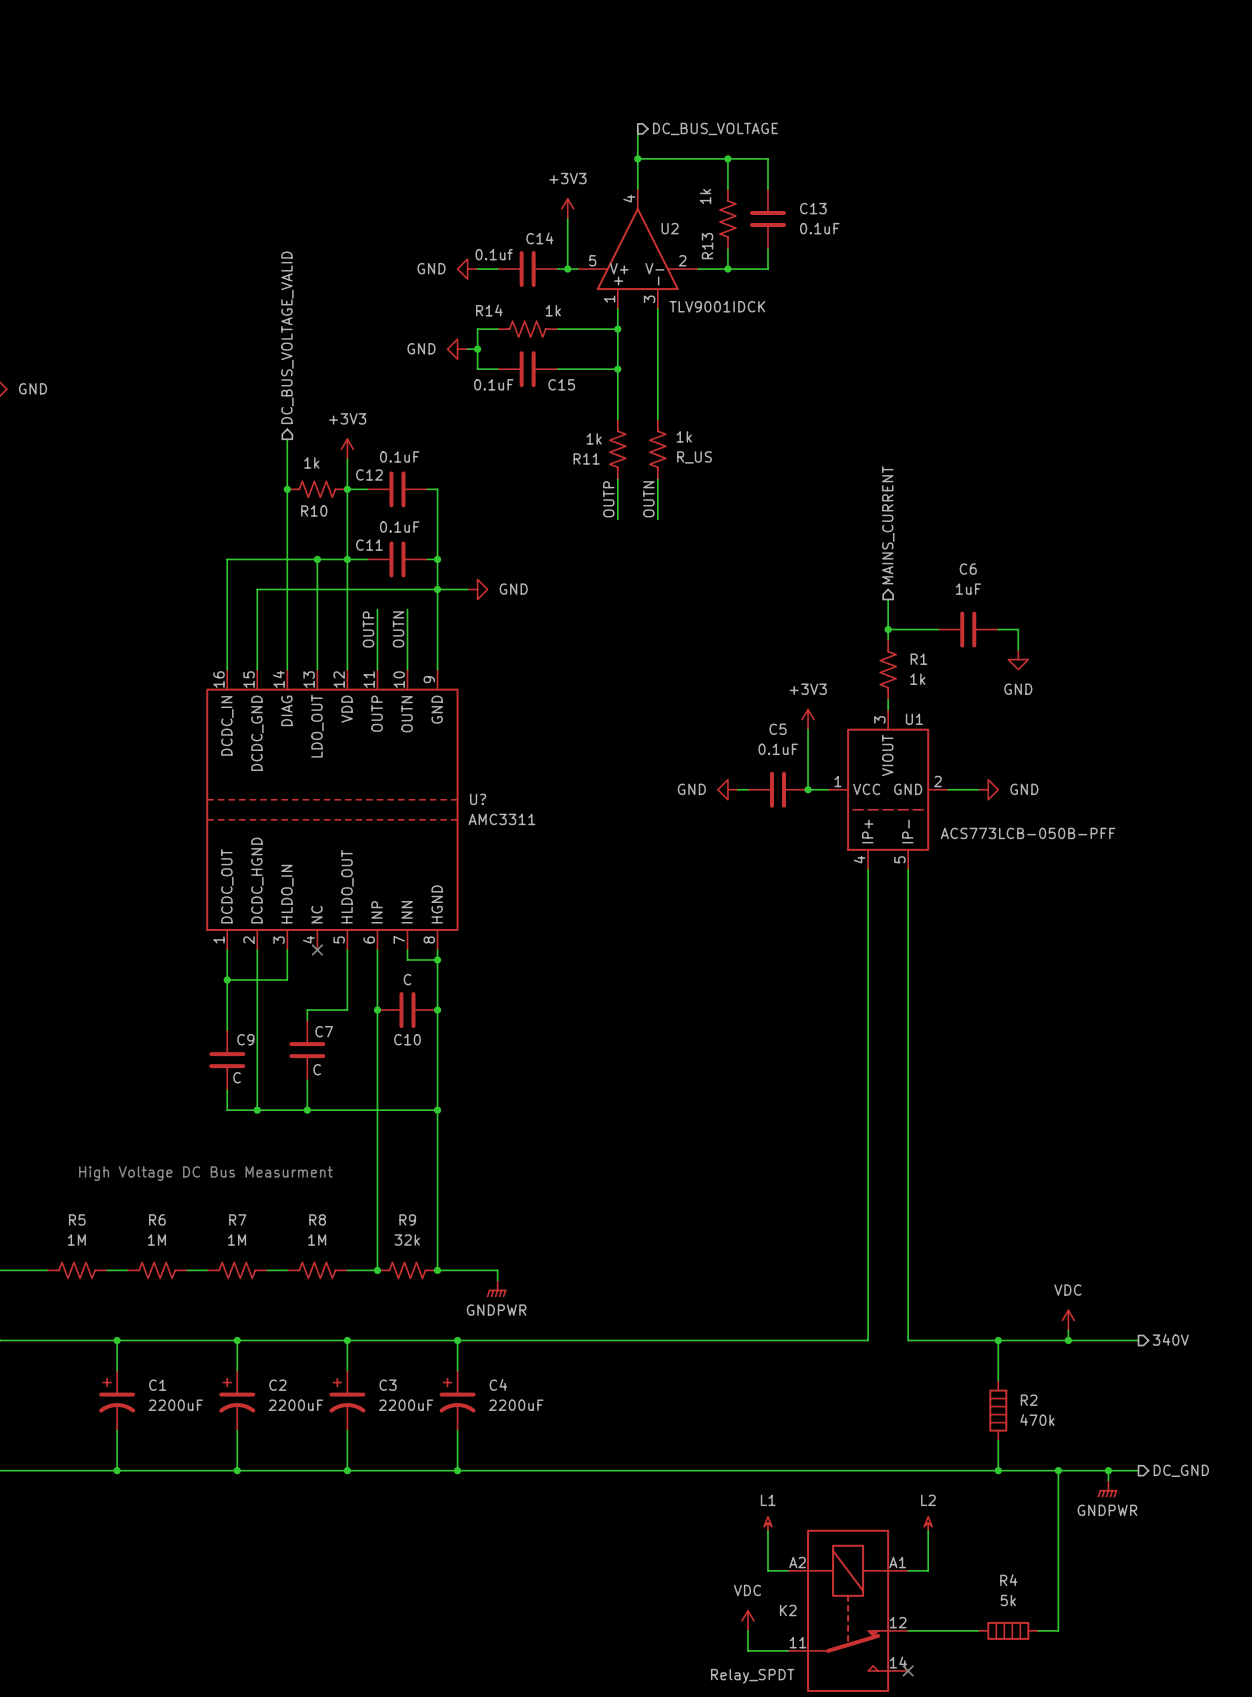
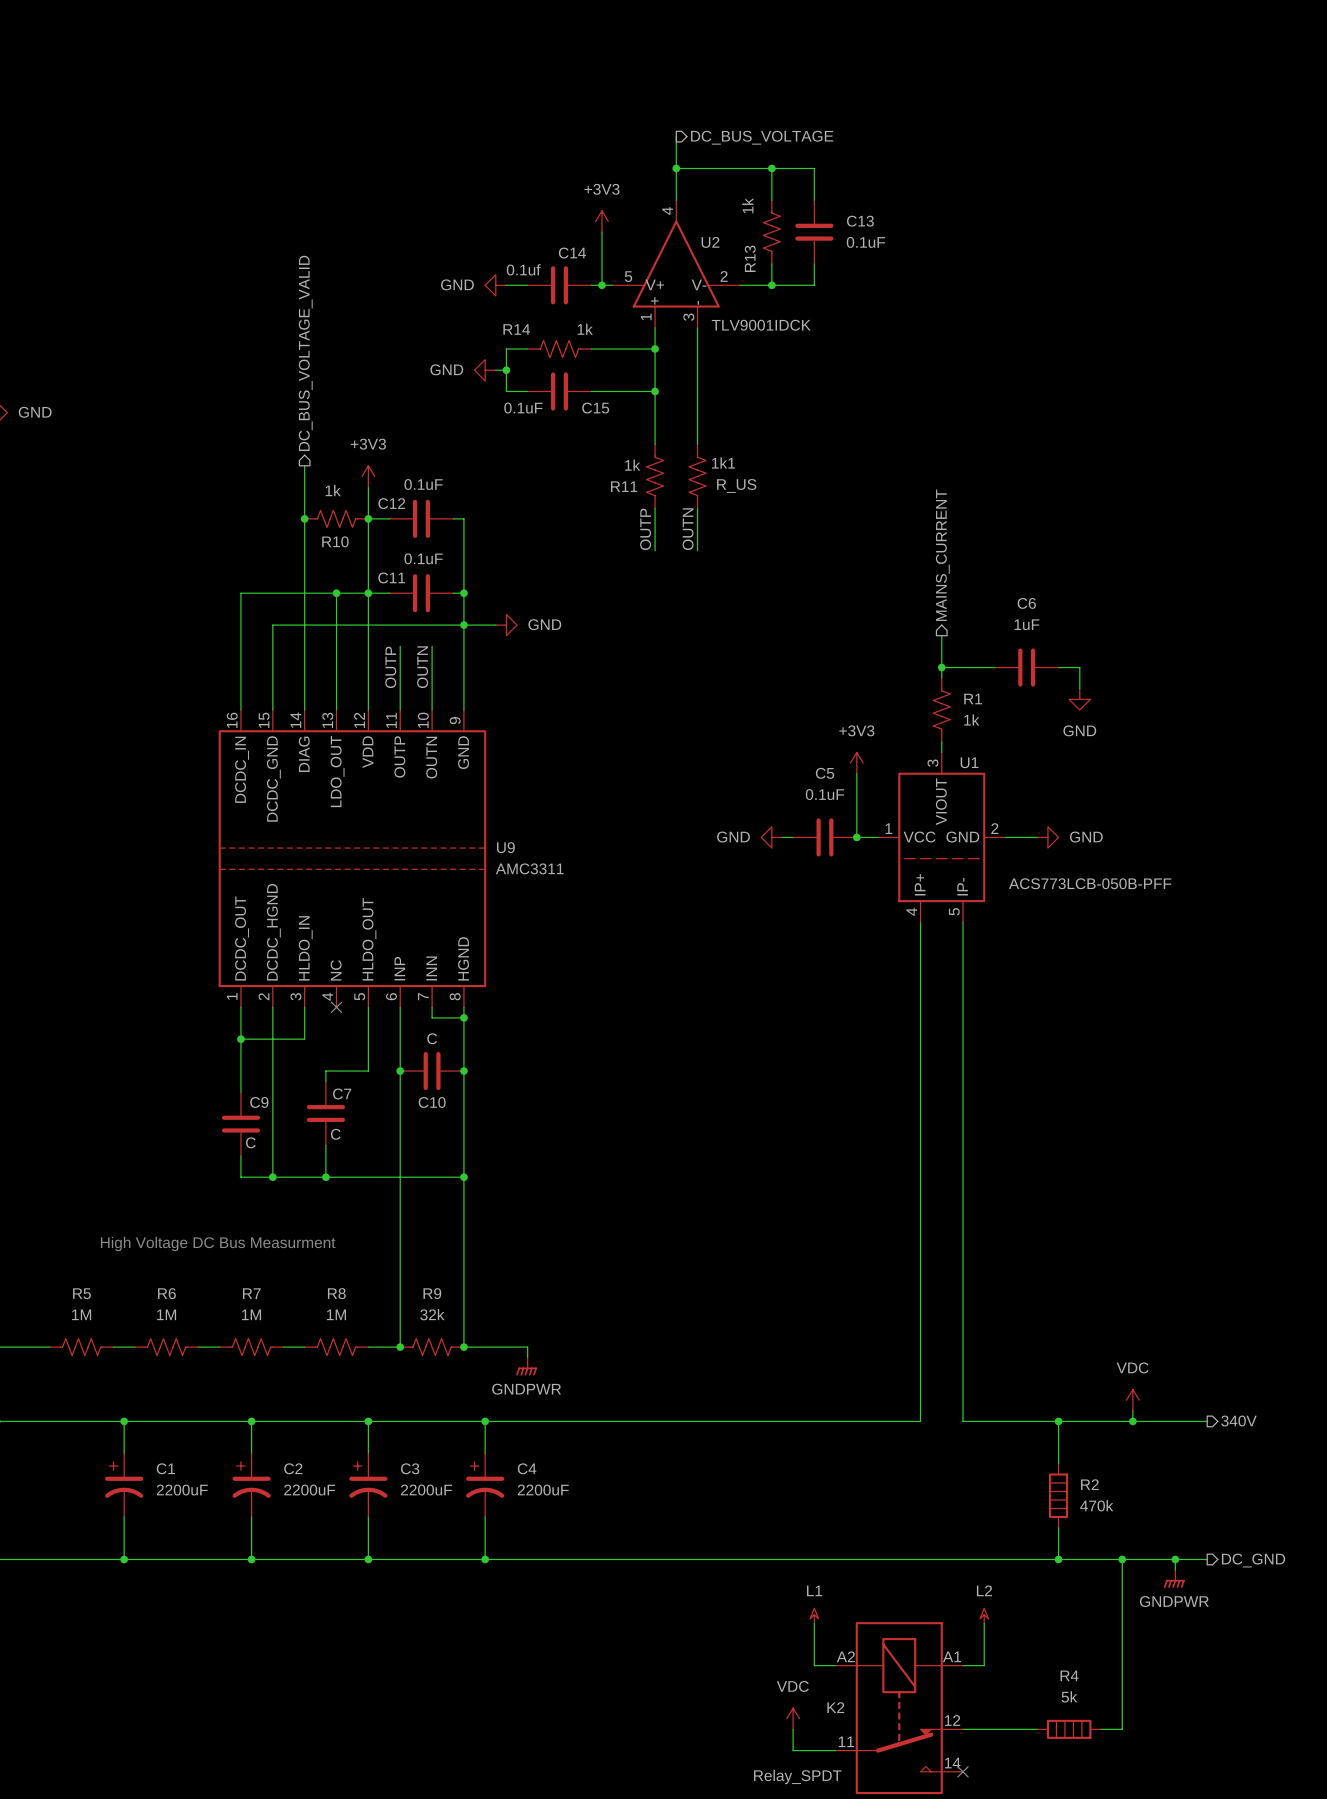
1k name: 1k (684, 436) -> 1k1 (723, 462)
U? name: U? (478, 799) -> U9 (505, 847)

